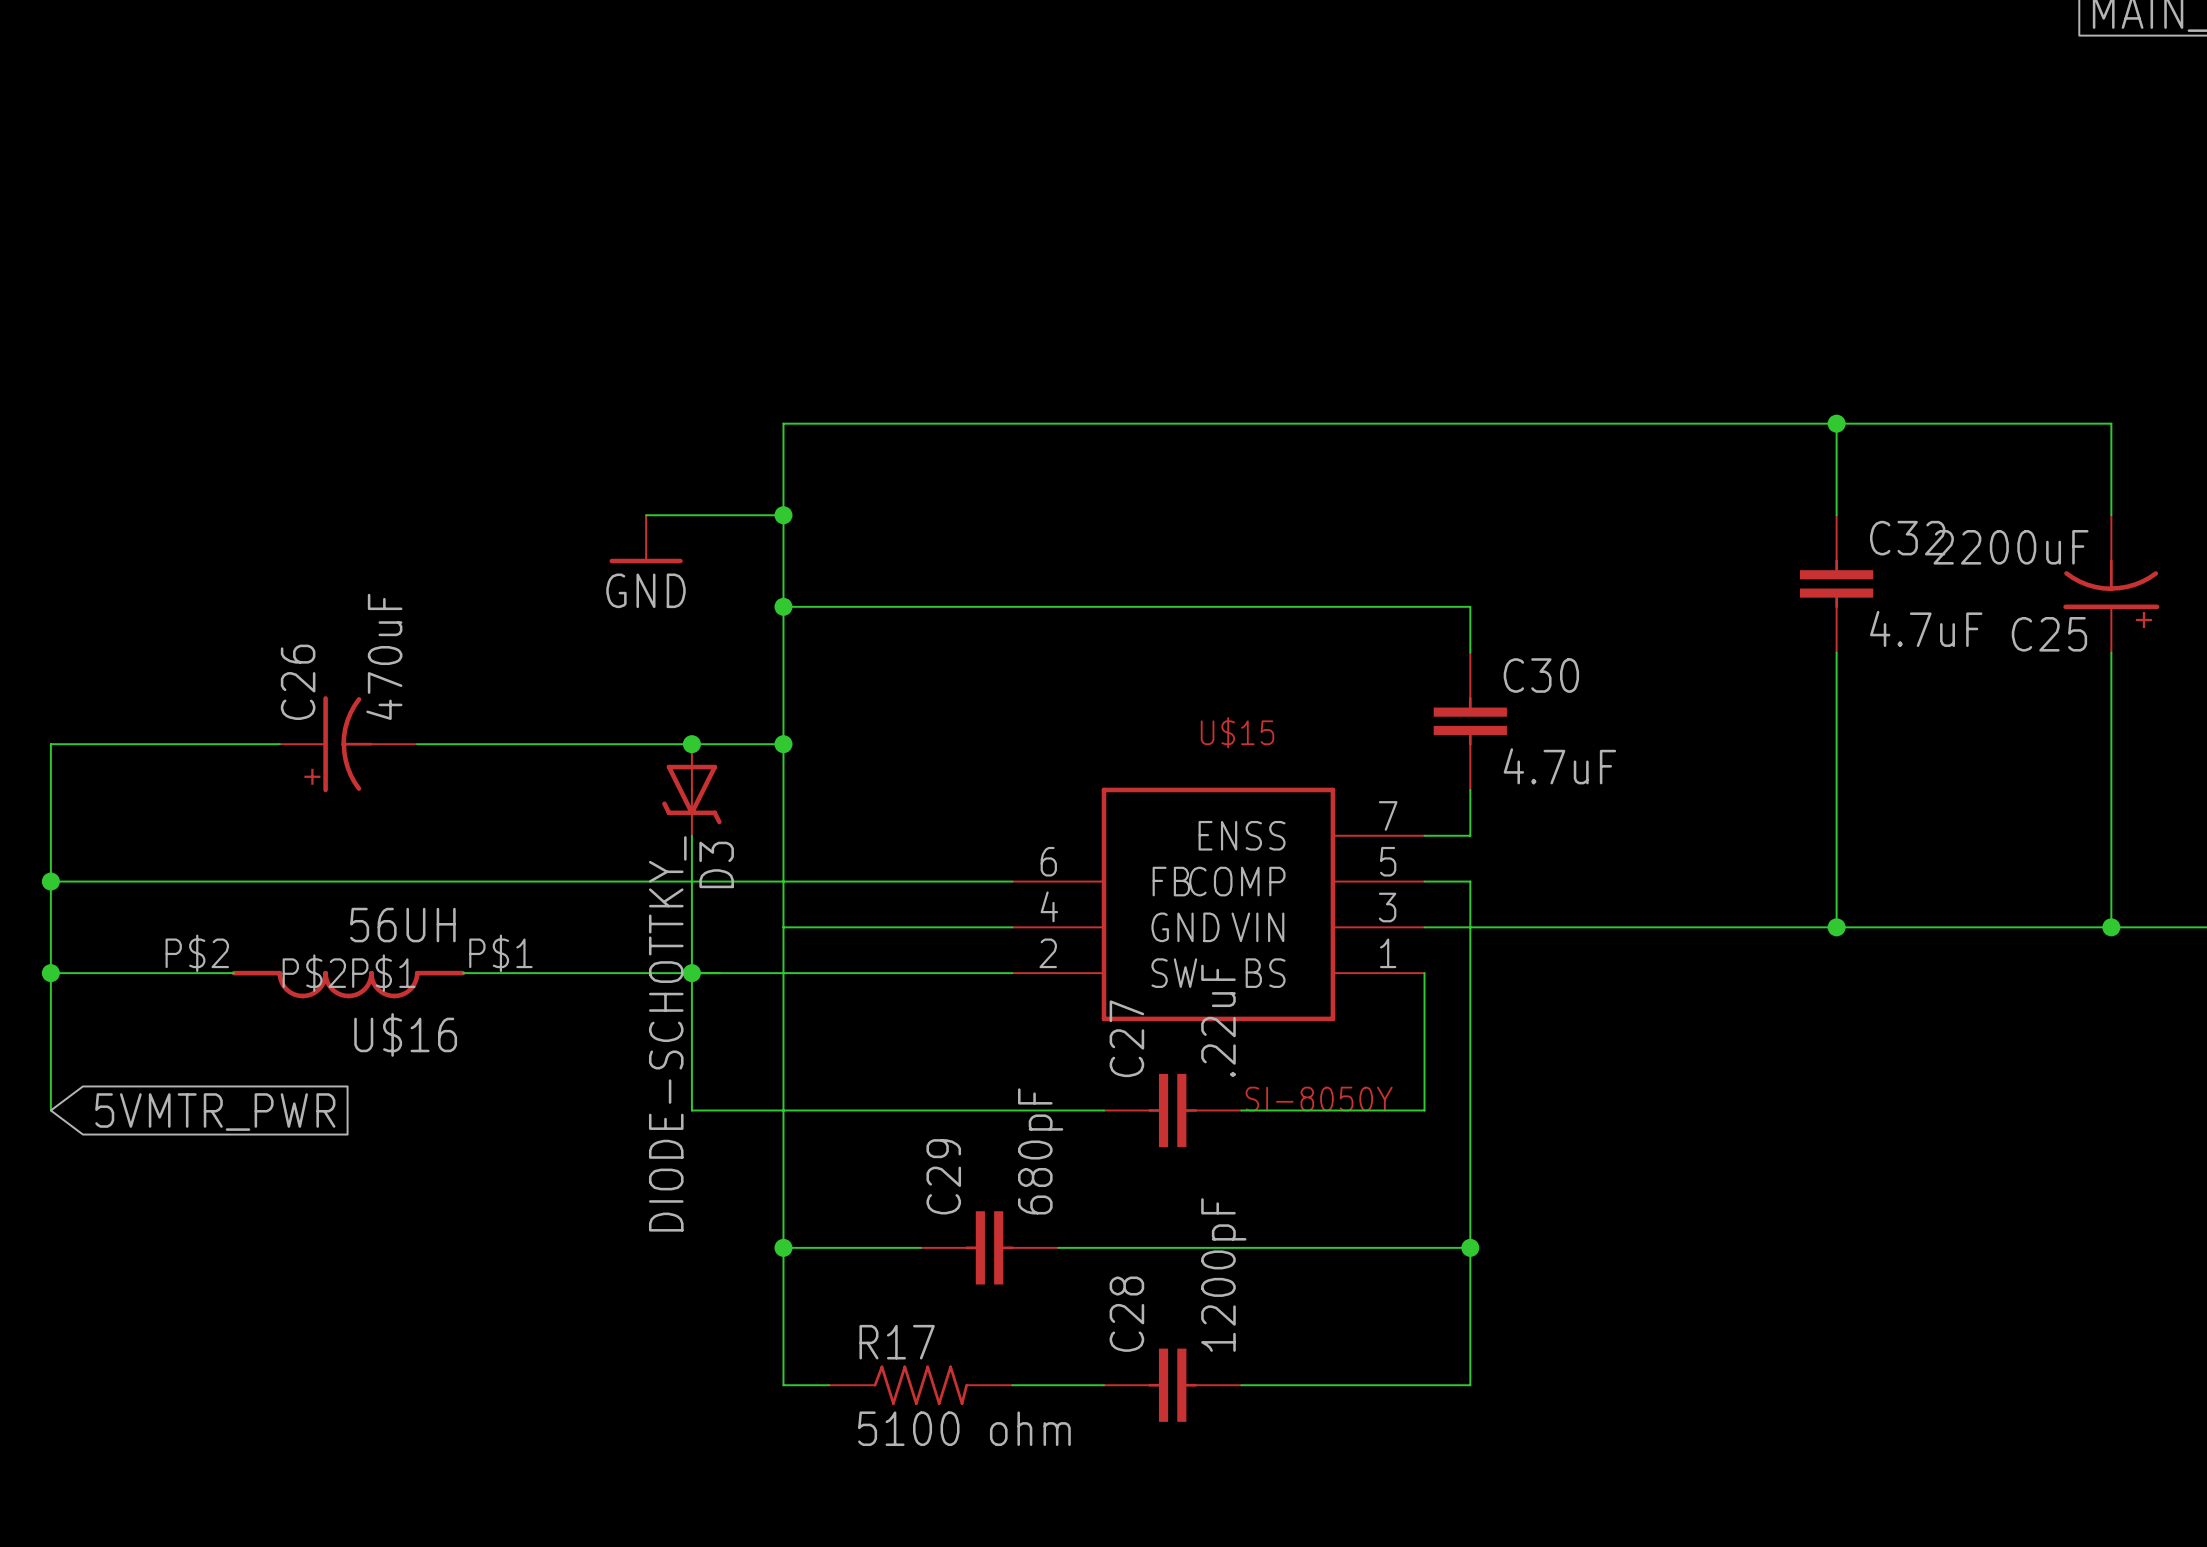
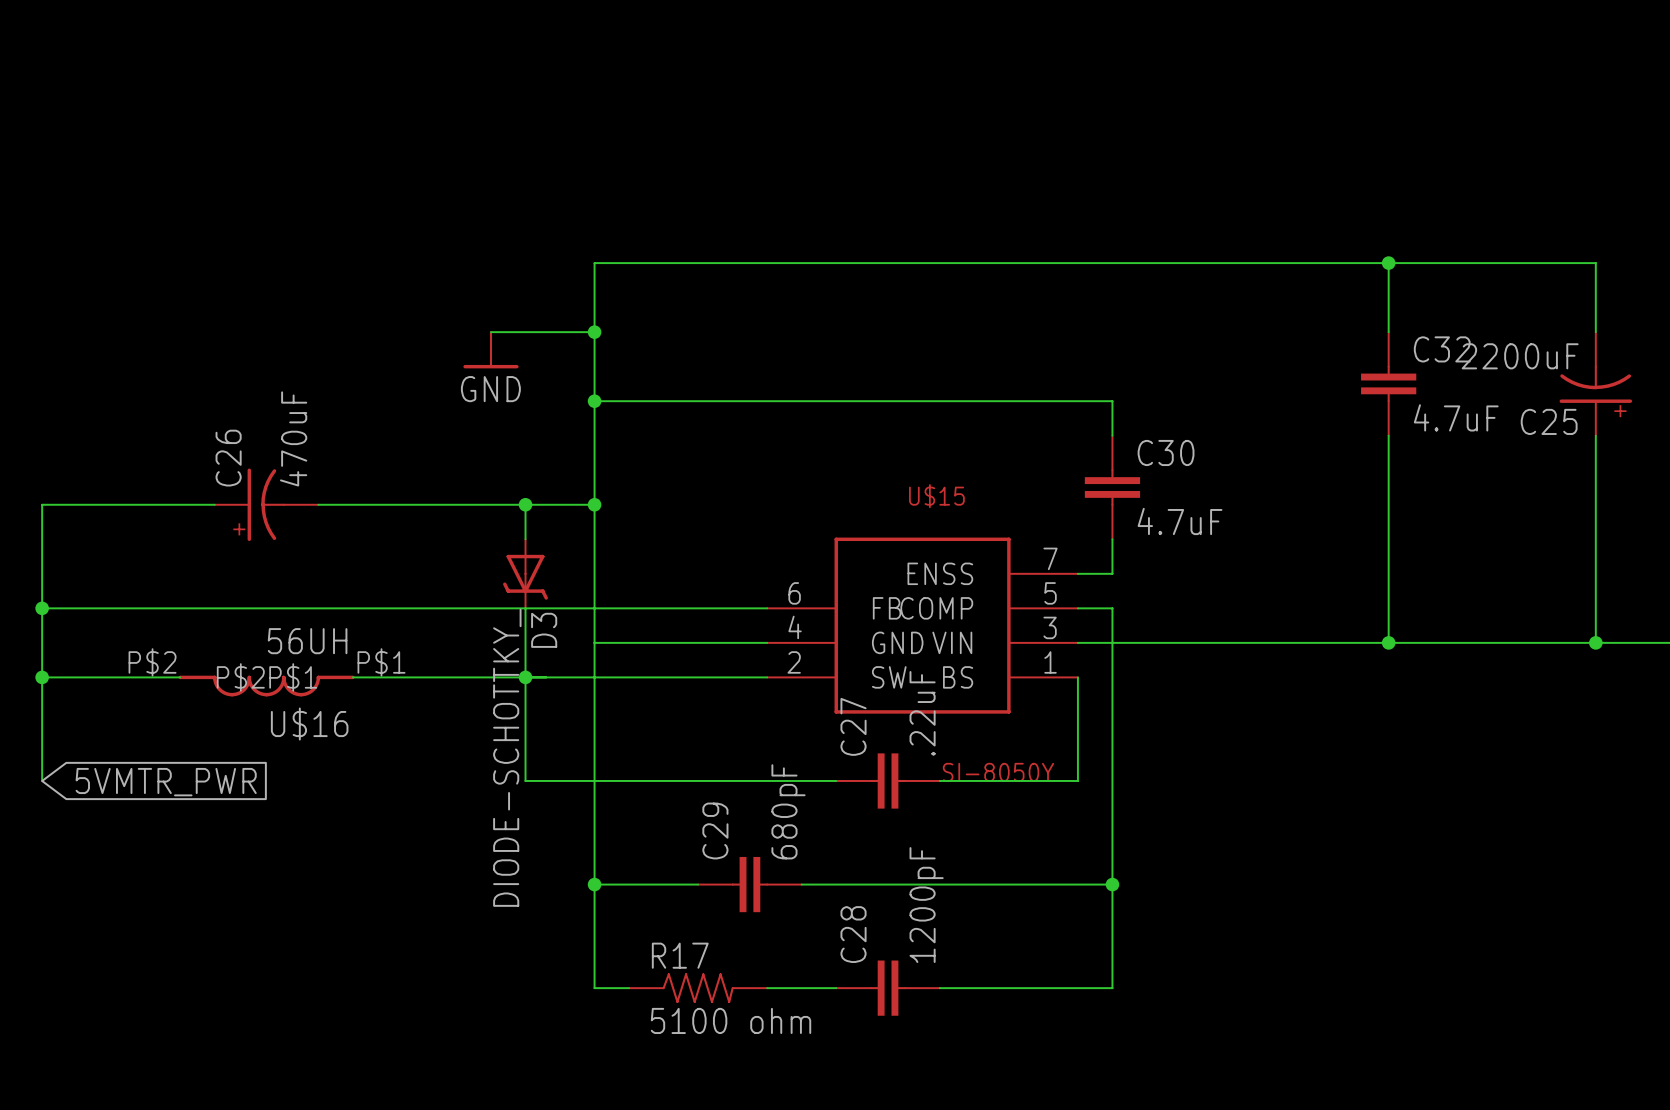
D3 position: (691, 789) -> (525, 573)

